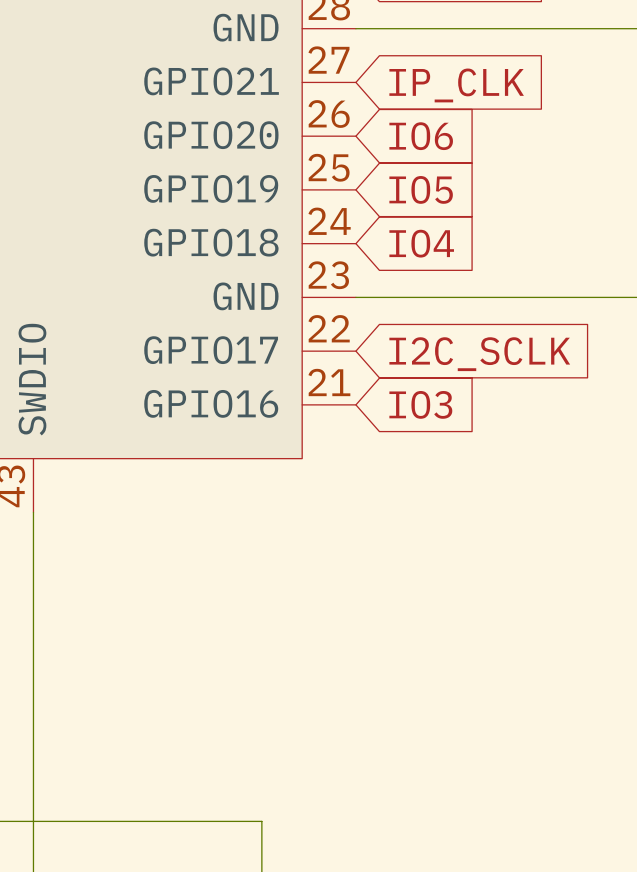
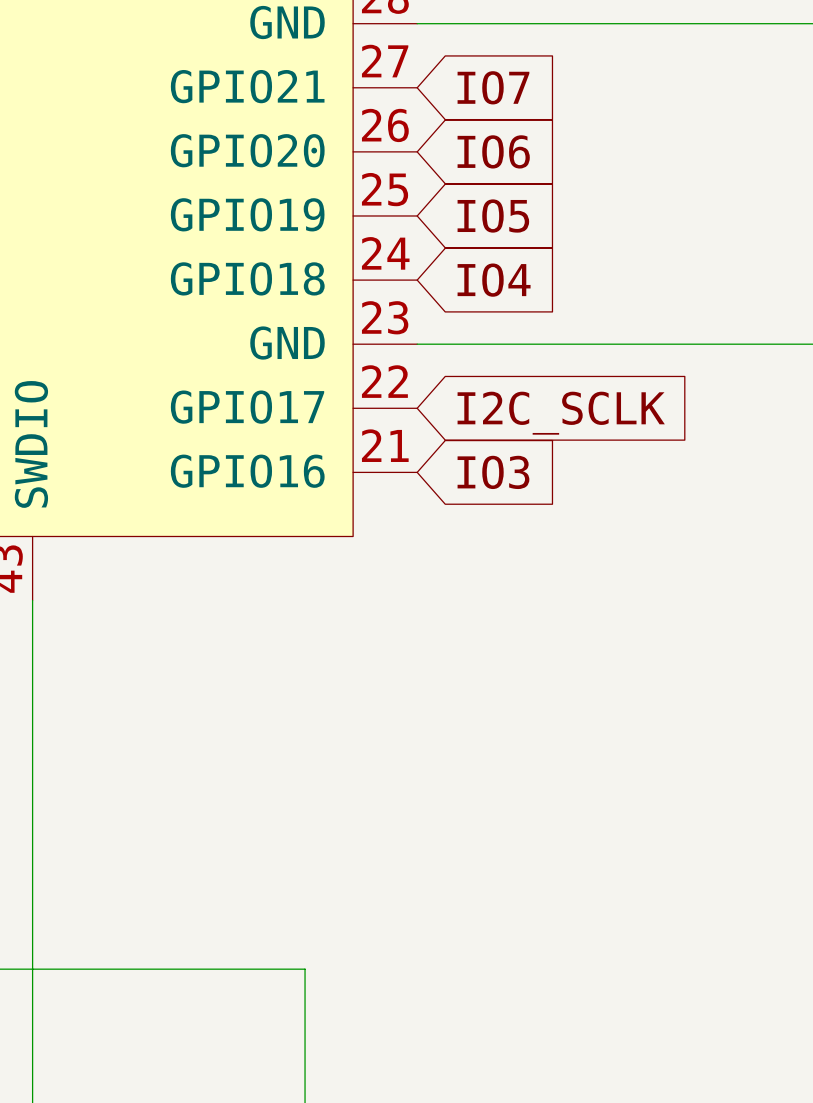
global label: IP_CLK (456, 85) -> IO7 (493, 87)

